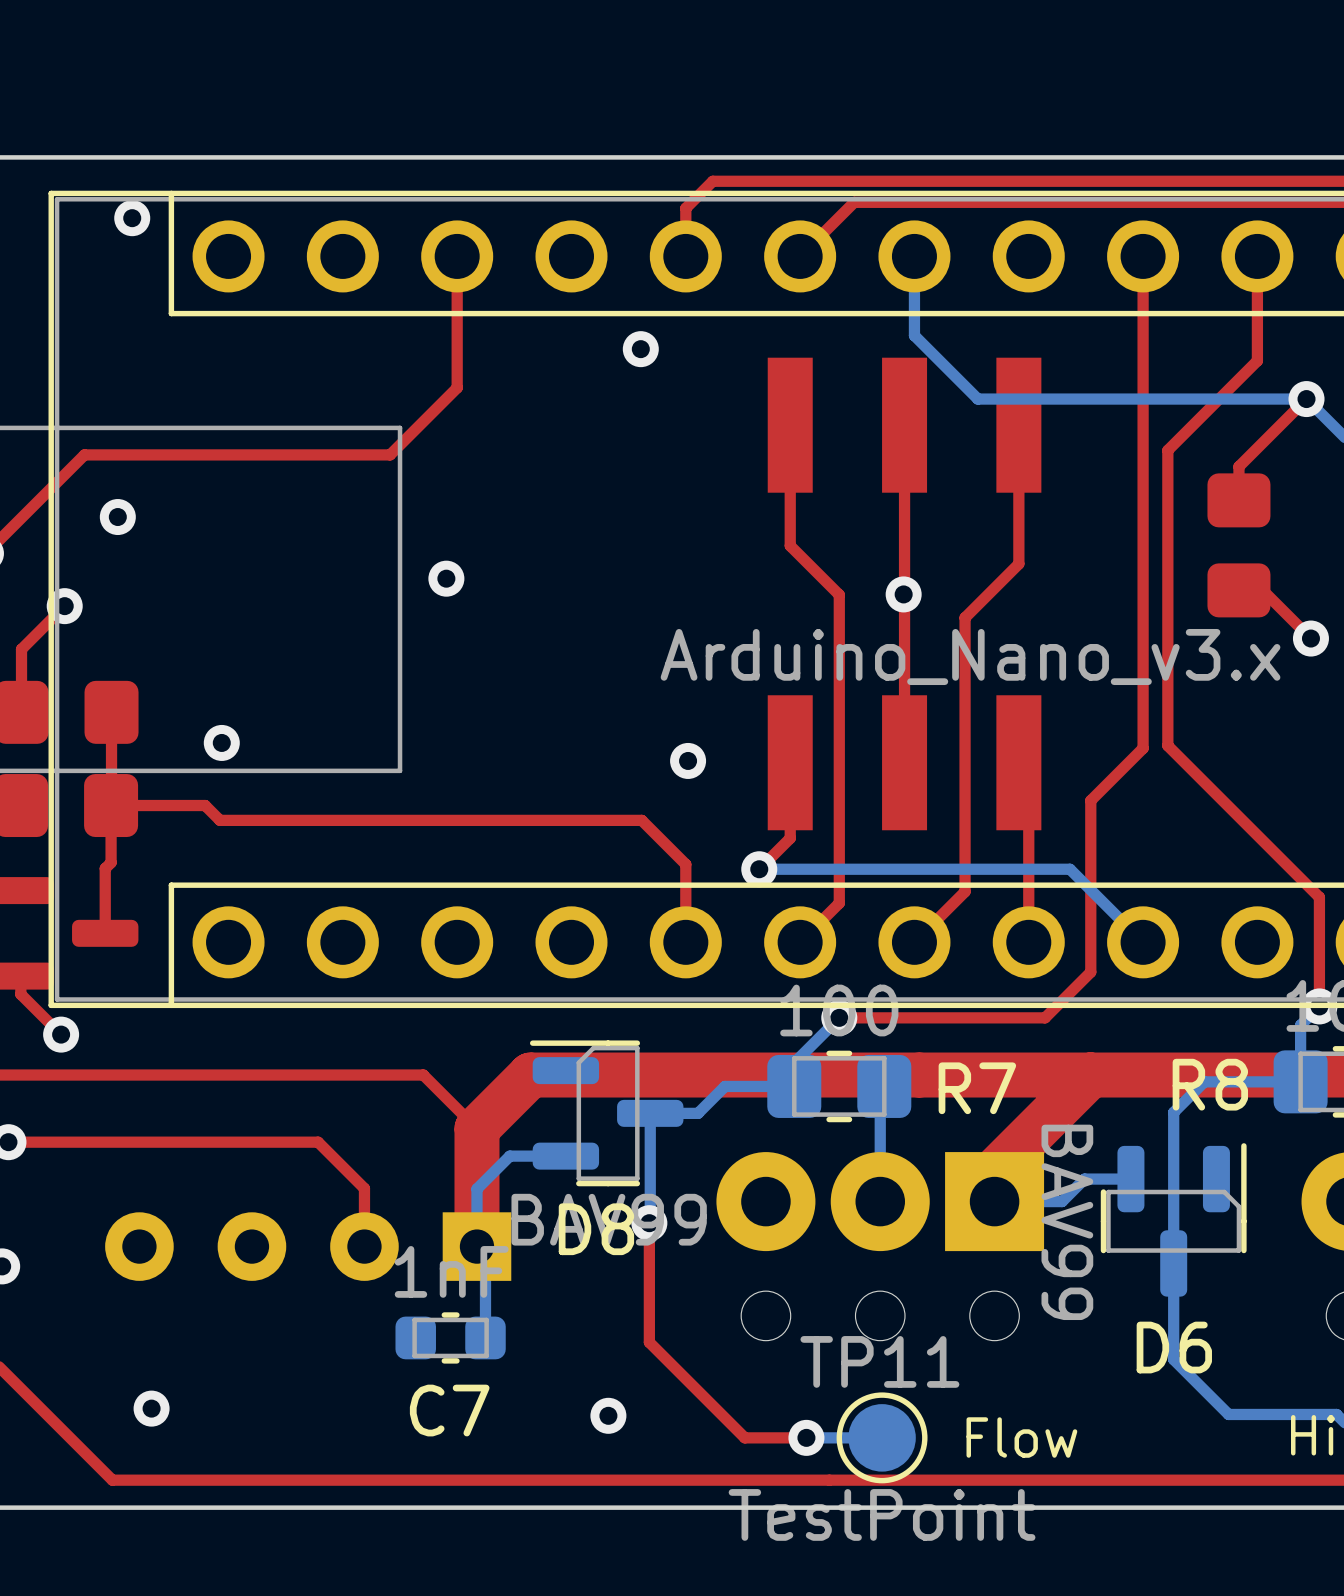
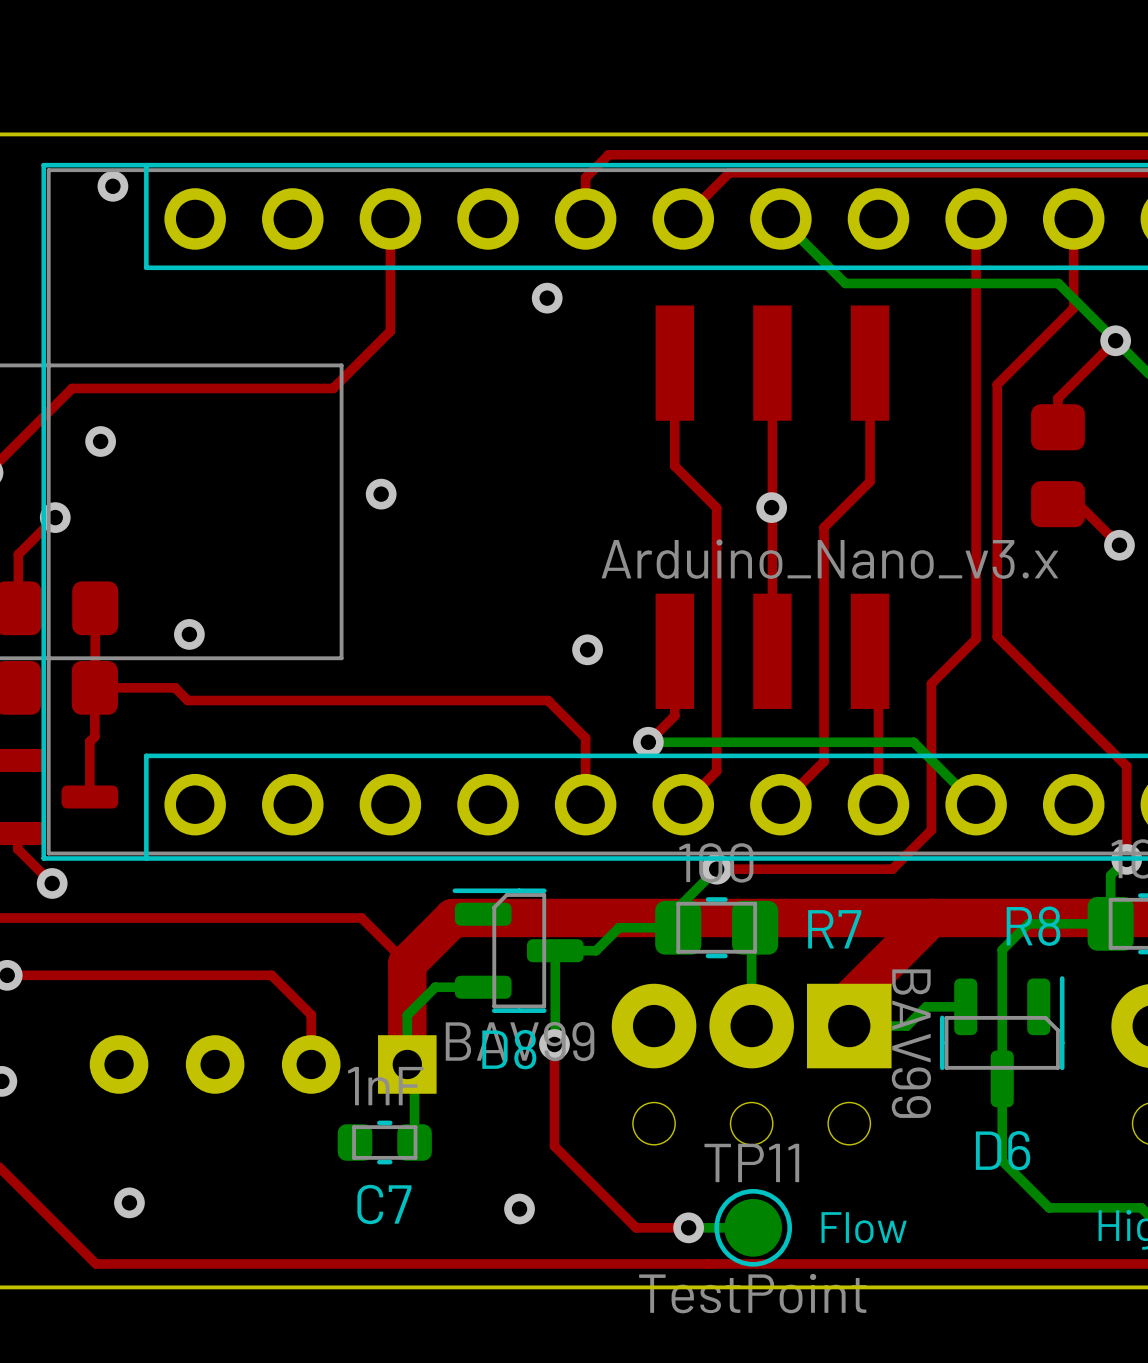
bottom track: (914, 256) (914, 335) (977, 399) (1306, 399) -> (780, 218) (845, 283) (1058, 283) (1115, 340)

